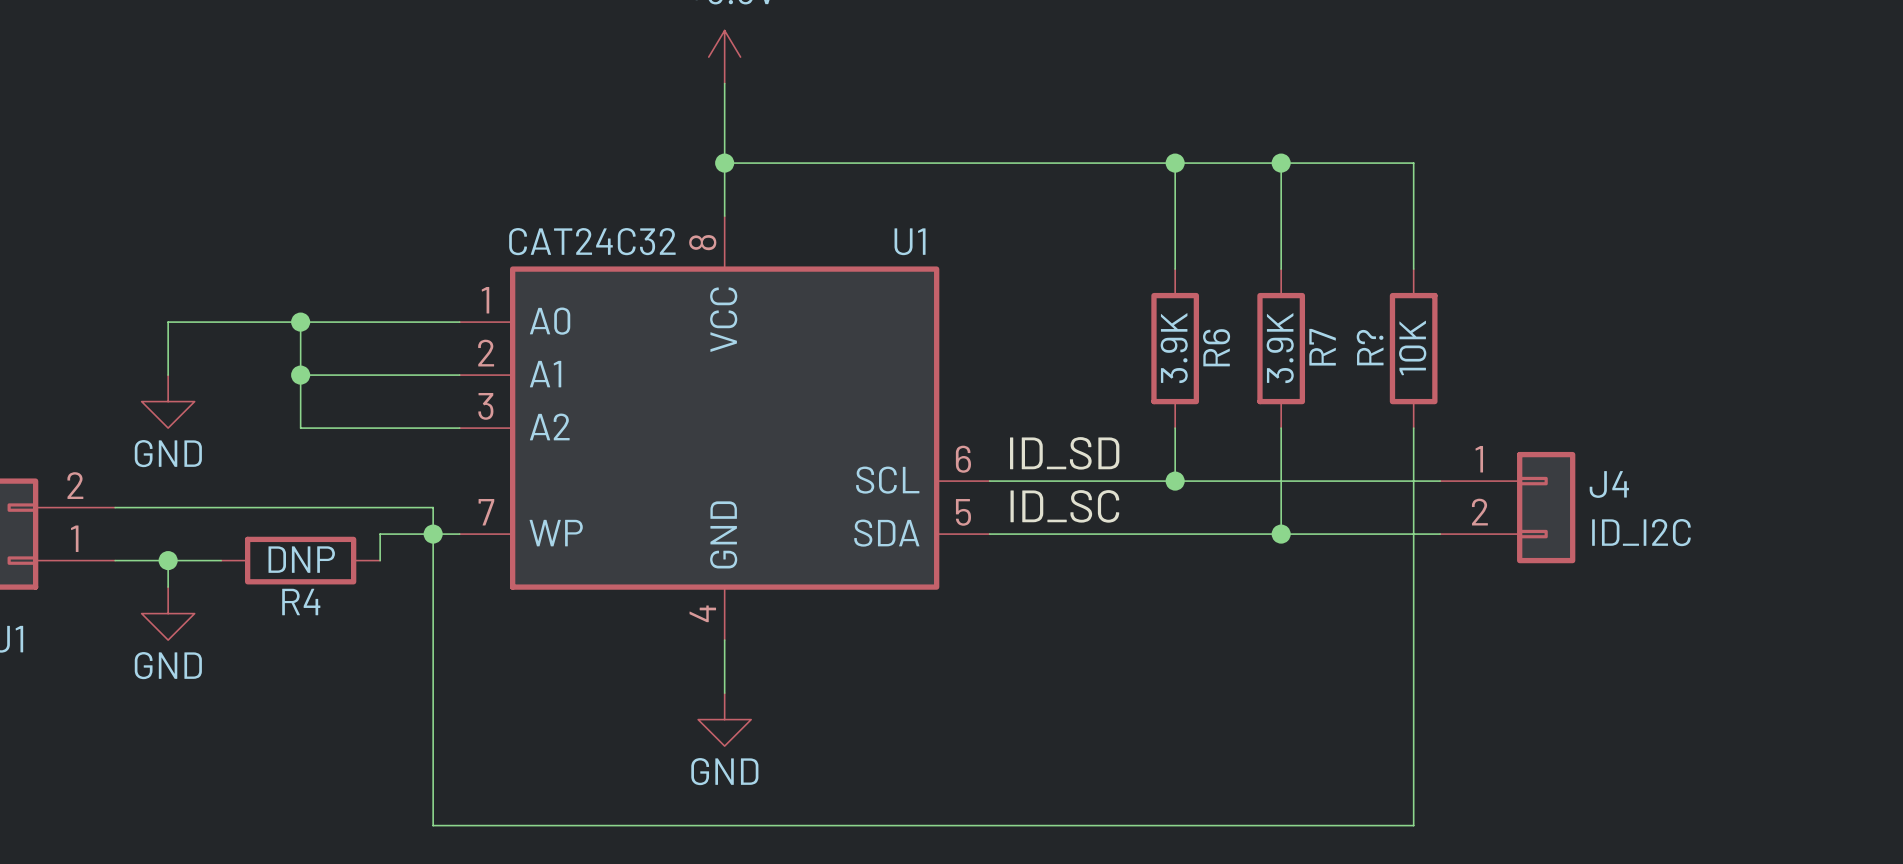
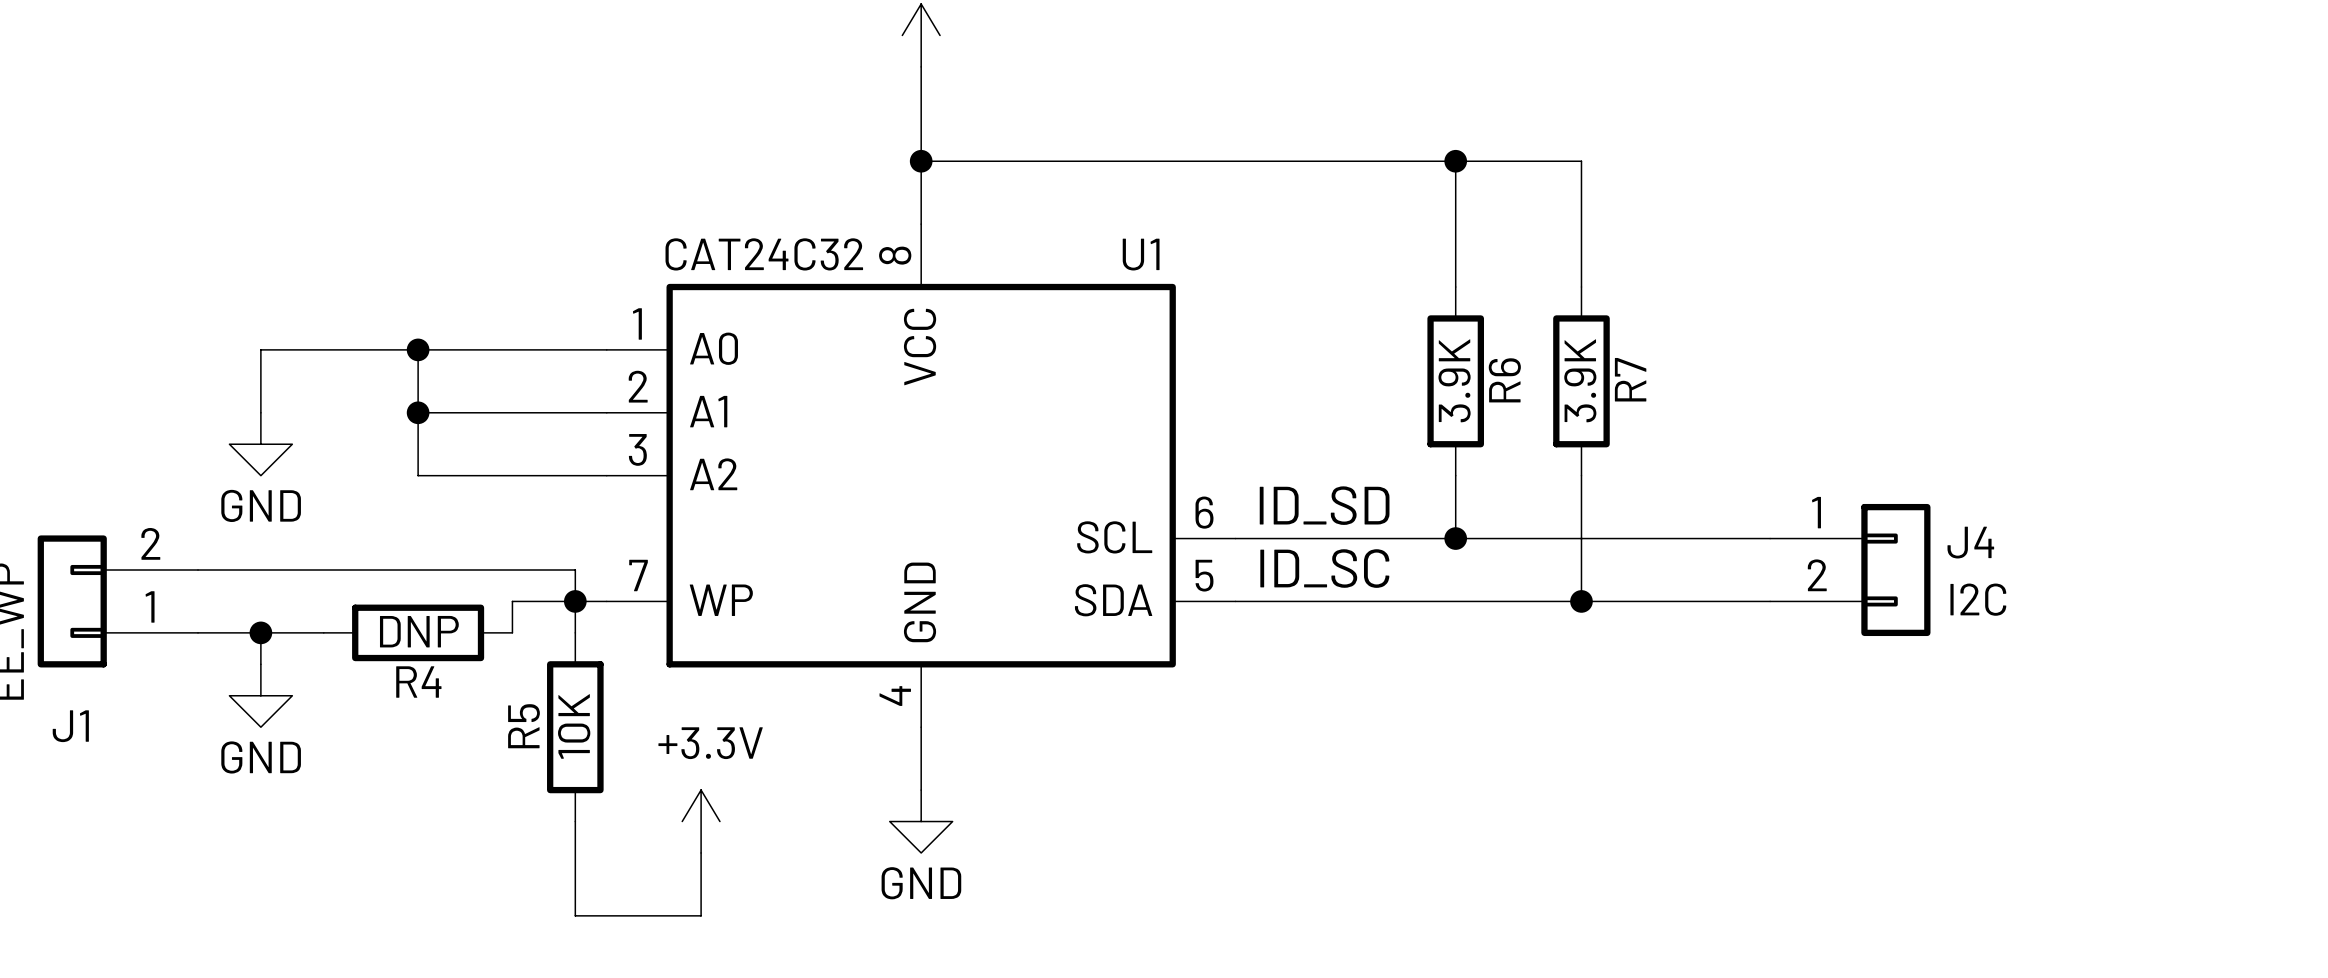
wire: (1281, 163) (1413, 163) (1413, 269) -> none
junction: (1281, 163) -> none
R?: 10K (1413, 348) -> none
wire: (1413, 428) (1413, 825) (433, 825) (433, 799) -> (701, 852) (701, 915) (575, 915)
J4 value: ID_I2C (1641, 532) -> I2C (1978, 599)
wire: (433, 560) (433, 719) -> none
R5: none -> 10K (575, 727)
power symbol: none -> +3.3V (701, 821)

